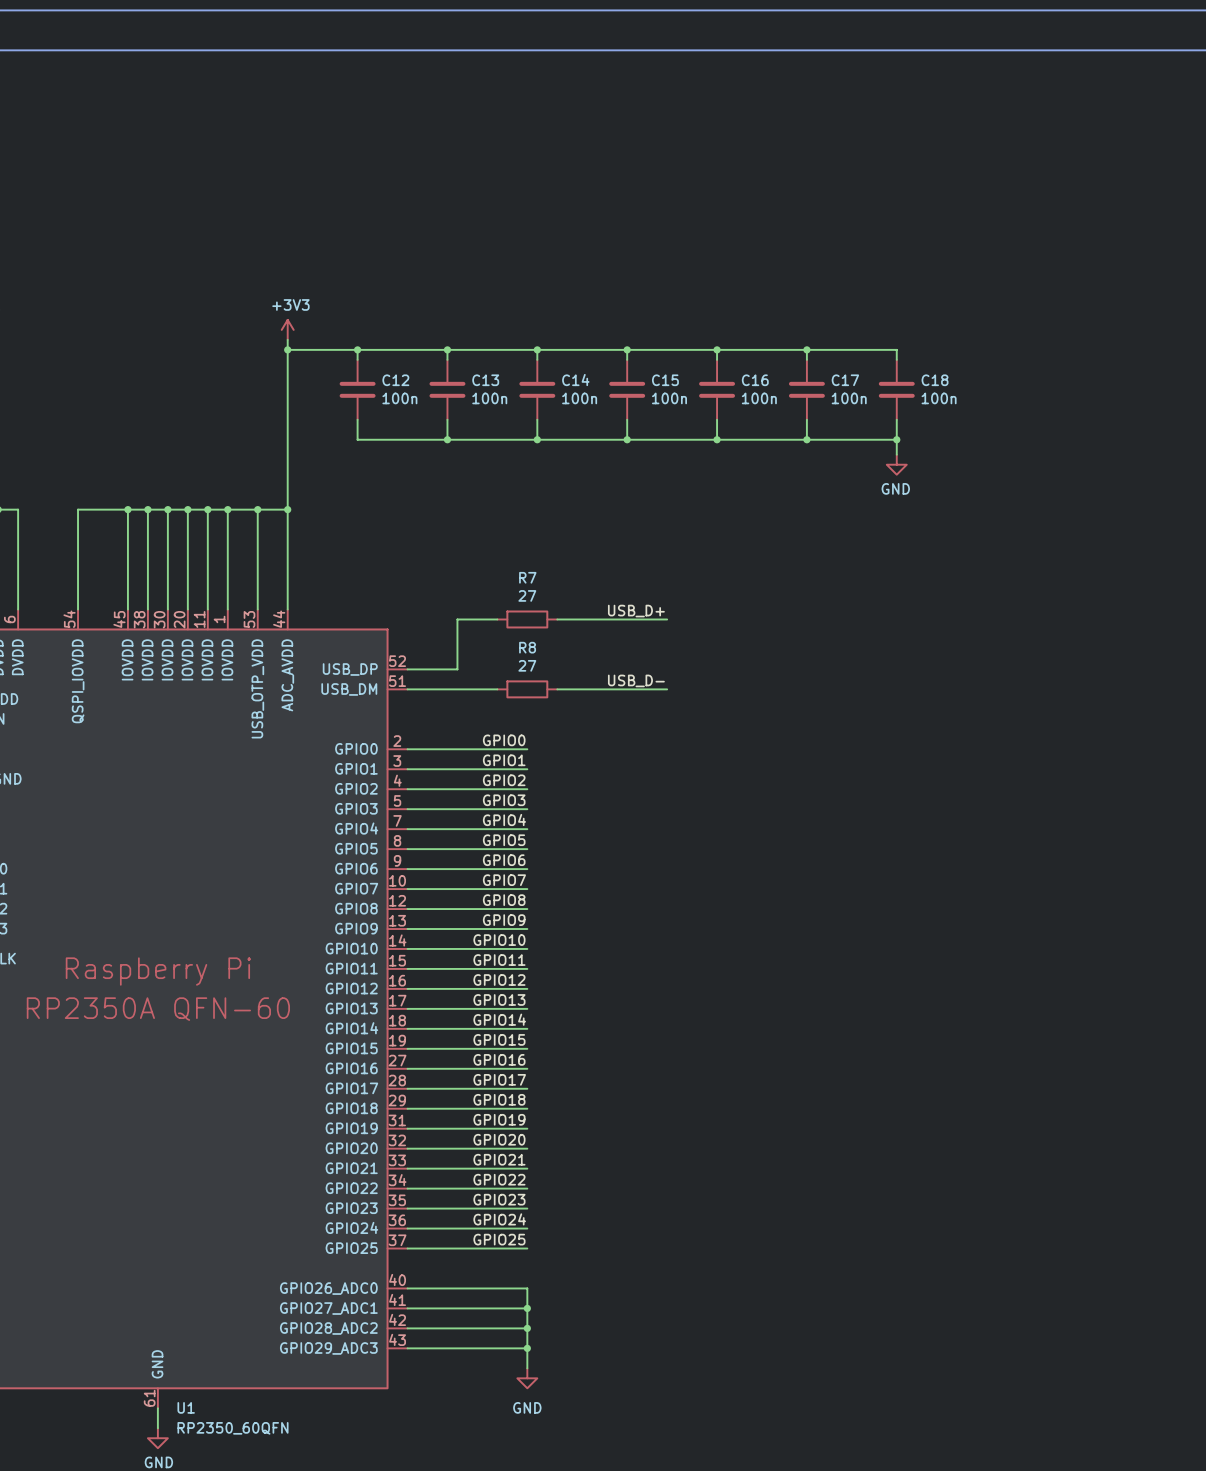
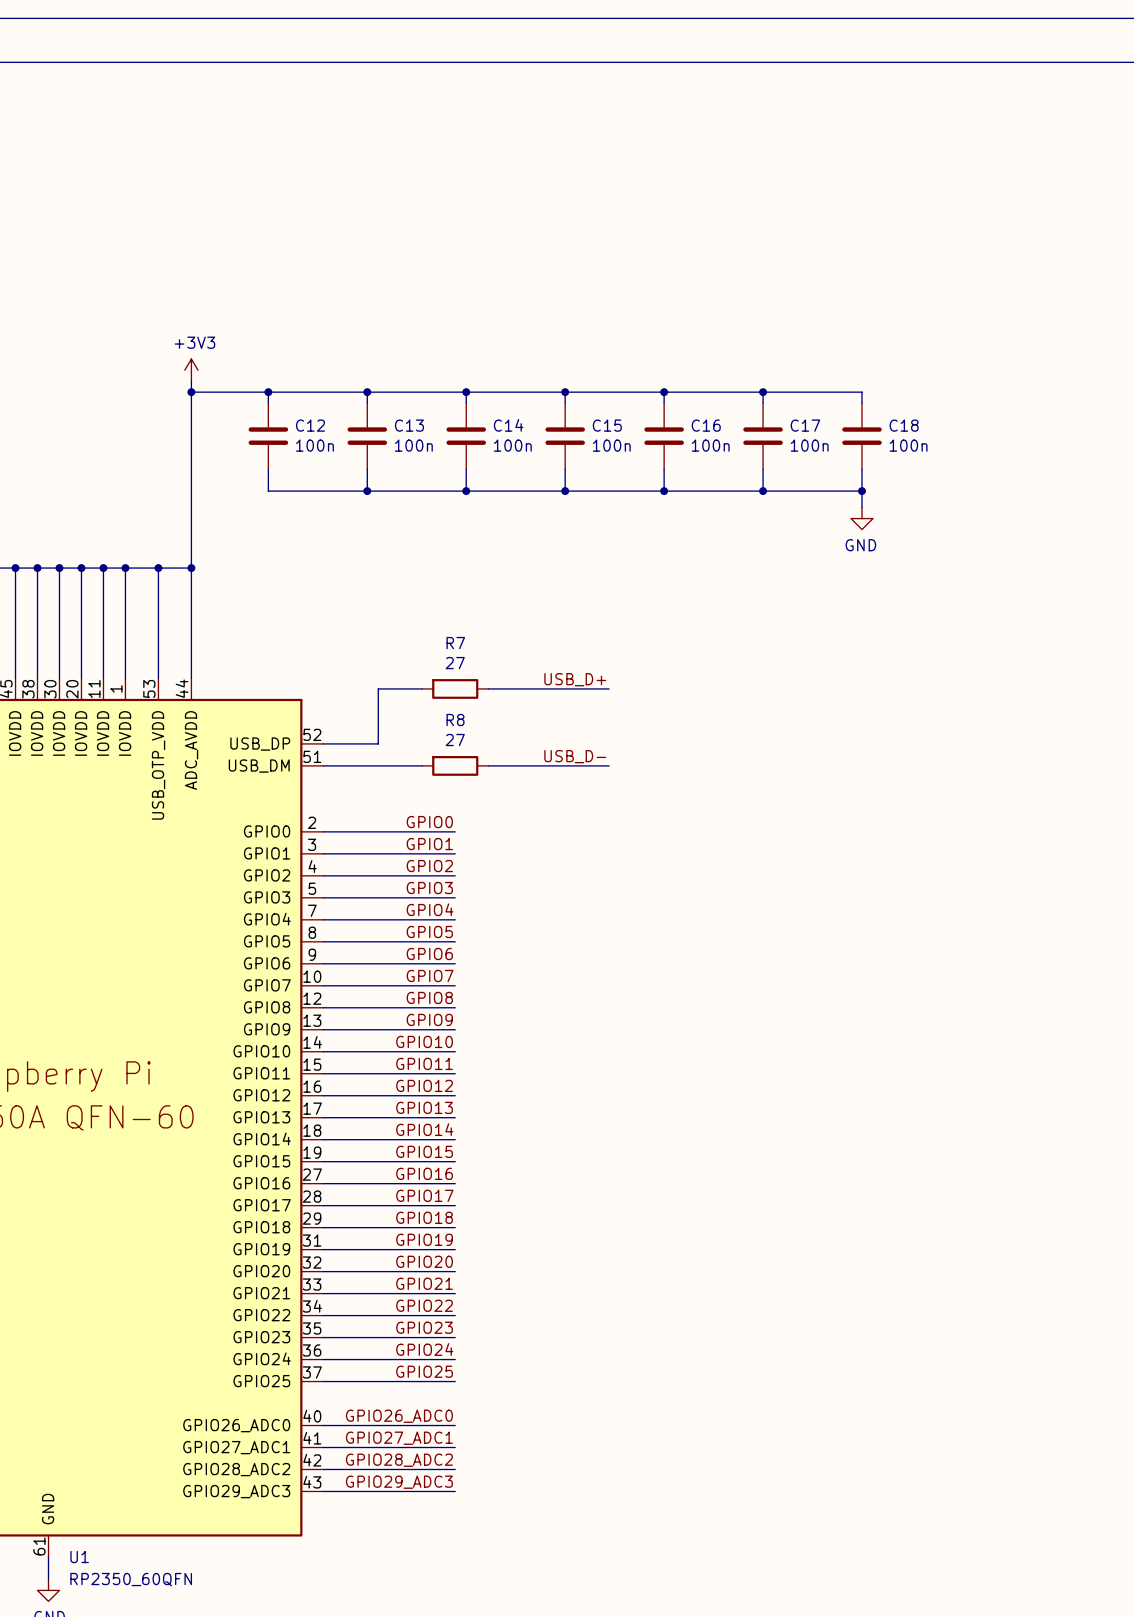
label: none -> GPIO26_ADC0 (399, 1416)
wire: (527, 1288) (527, 1368) -> none
label: none -> GPIO27_ADC1 (399, 1438)
junction: (527, 1308) -> none
label: none -> GPIO28_ADC2 (399, 1460)
junction: (527, 1328) -> none
label: none -> GPIO29_ADC3 (399, 1482)
junction: (527, 1348) -> none
power symbol: GND (527, 1378) -> none

